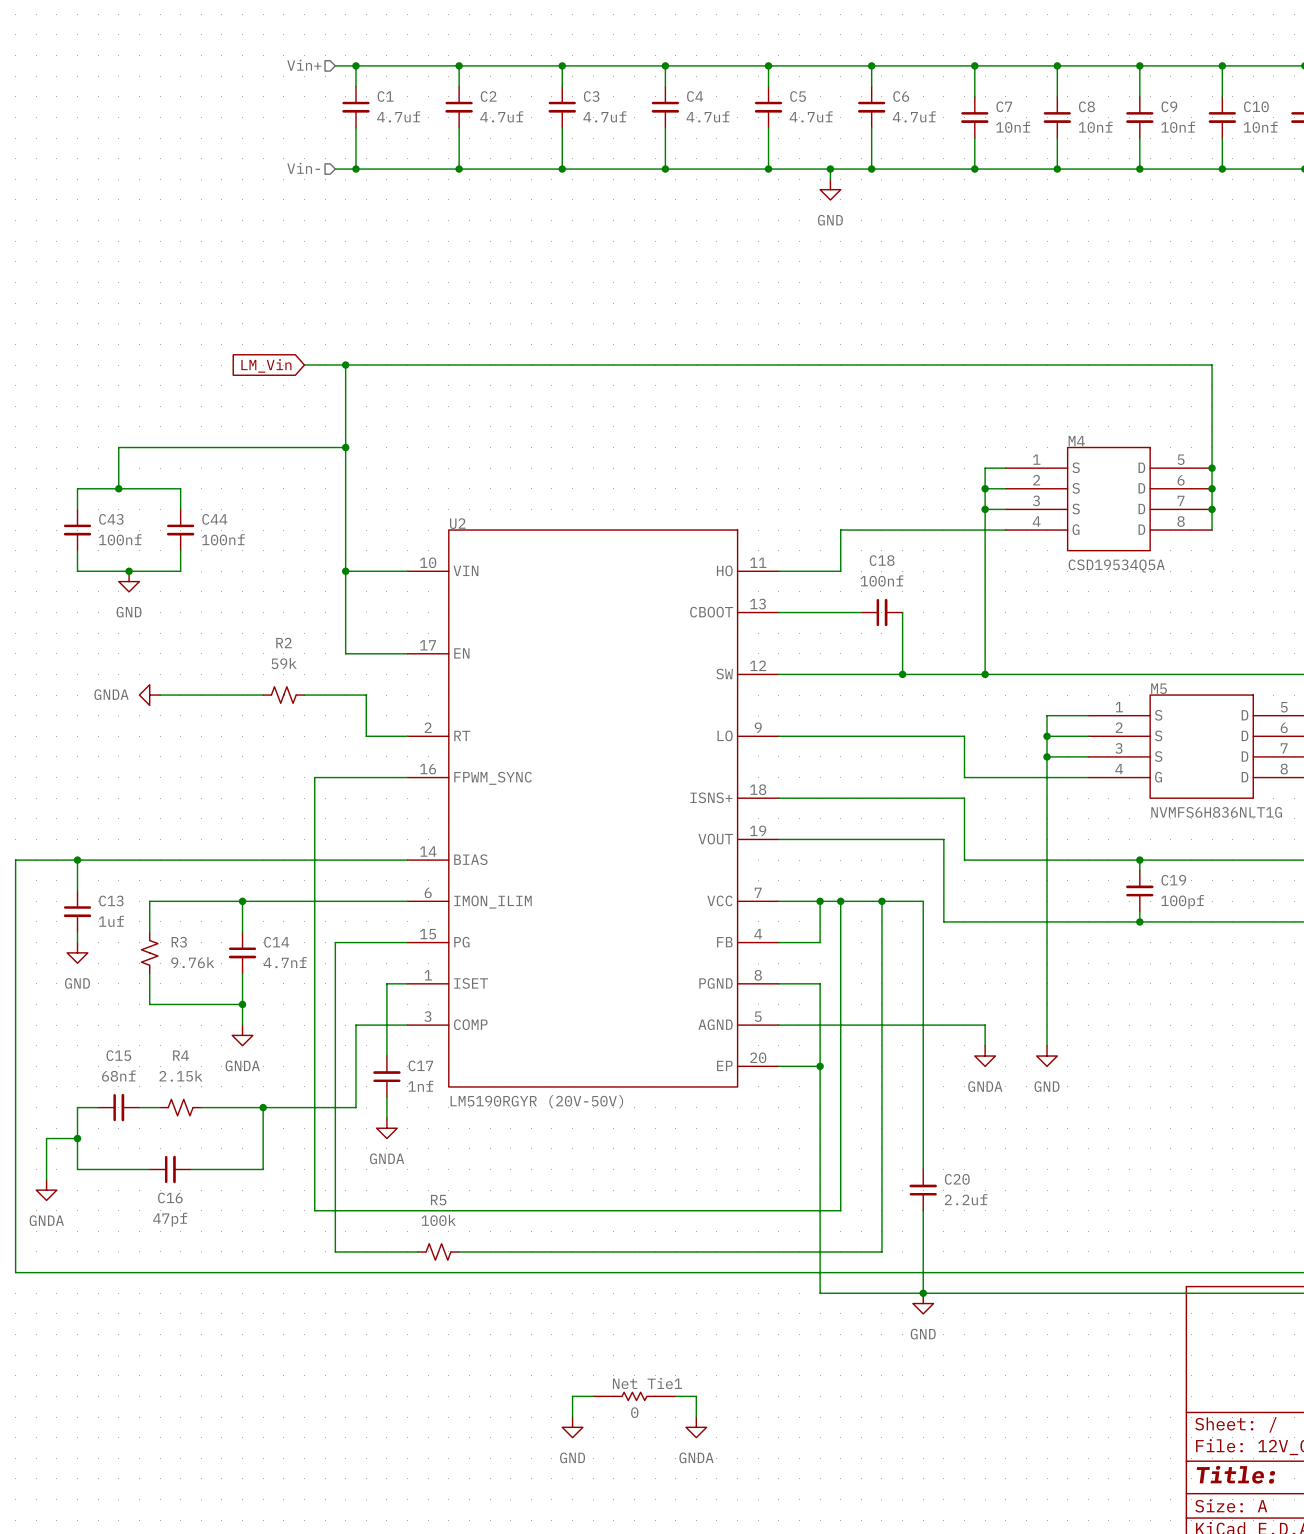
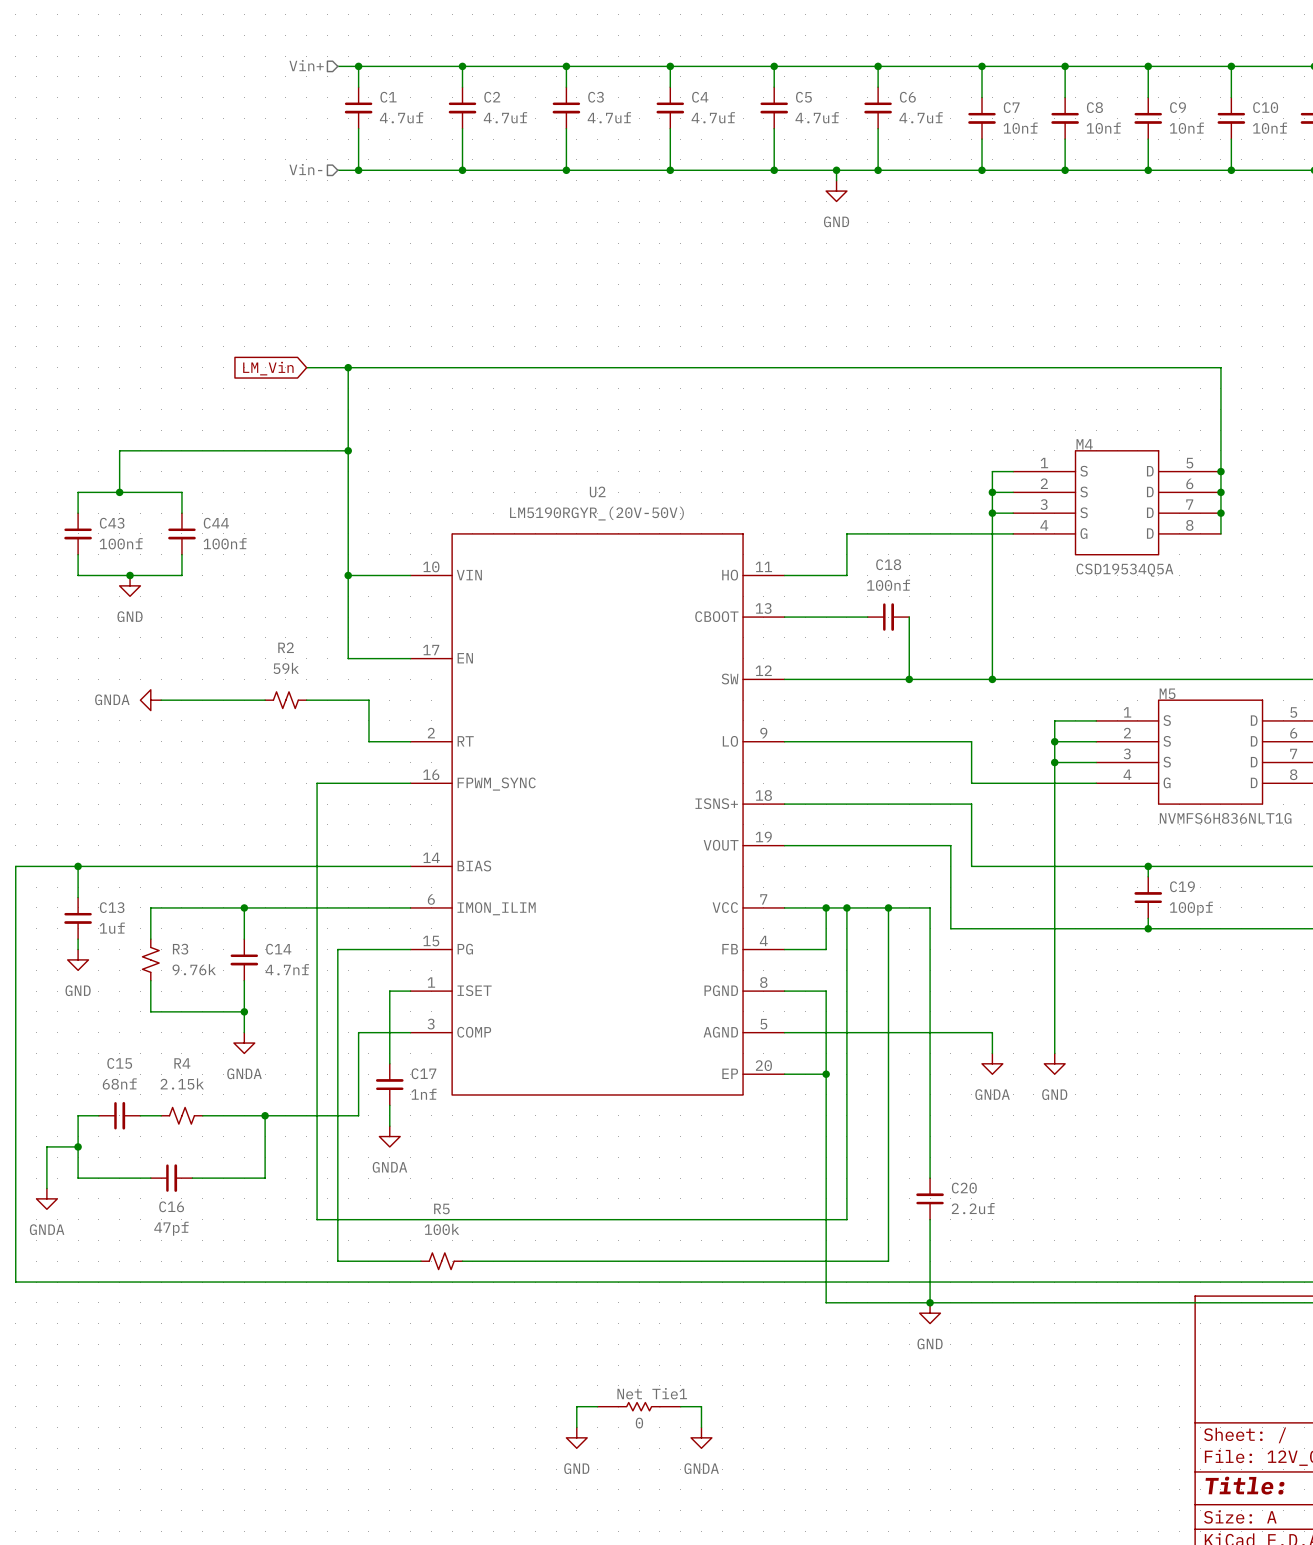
U2 name position: U2 (457, 523) -> U2 (597, 491)
U2 value: LM5190RGYR (20V-50V) (536, 1101) -> LM5190RGYR_(20V-50V) (596, 513)

